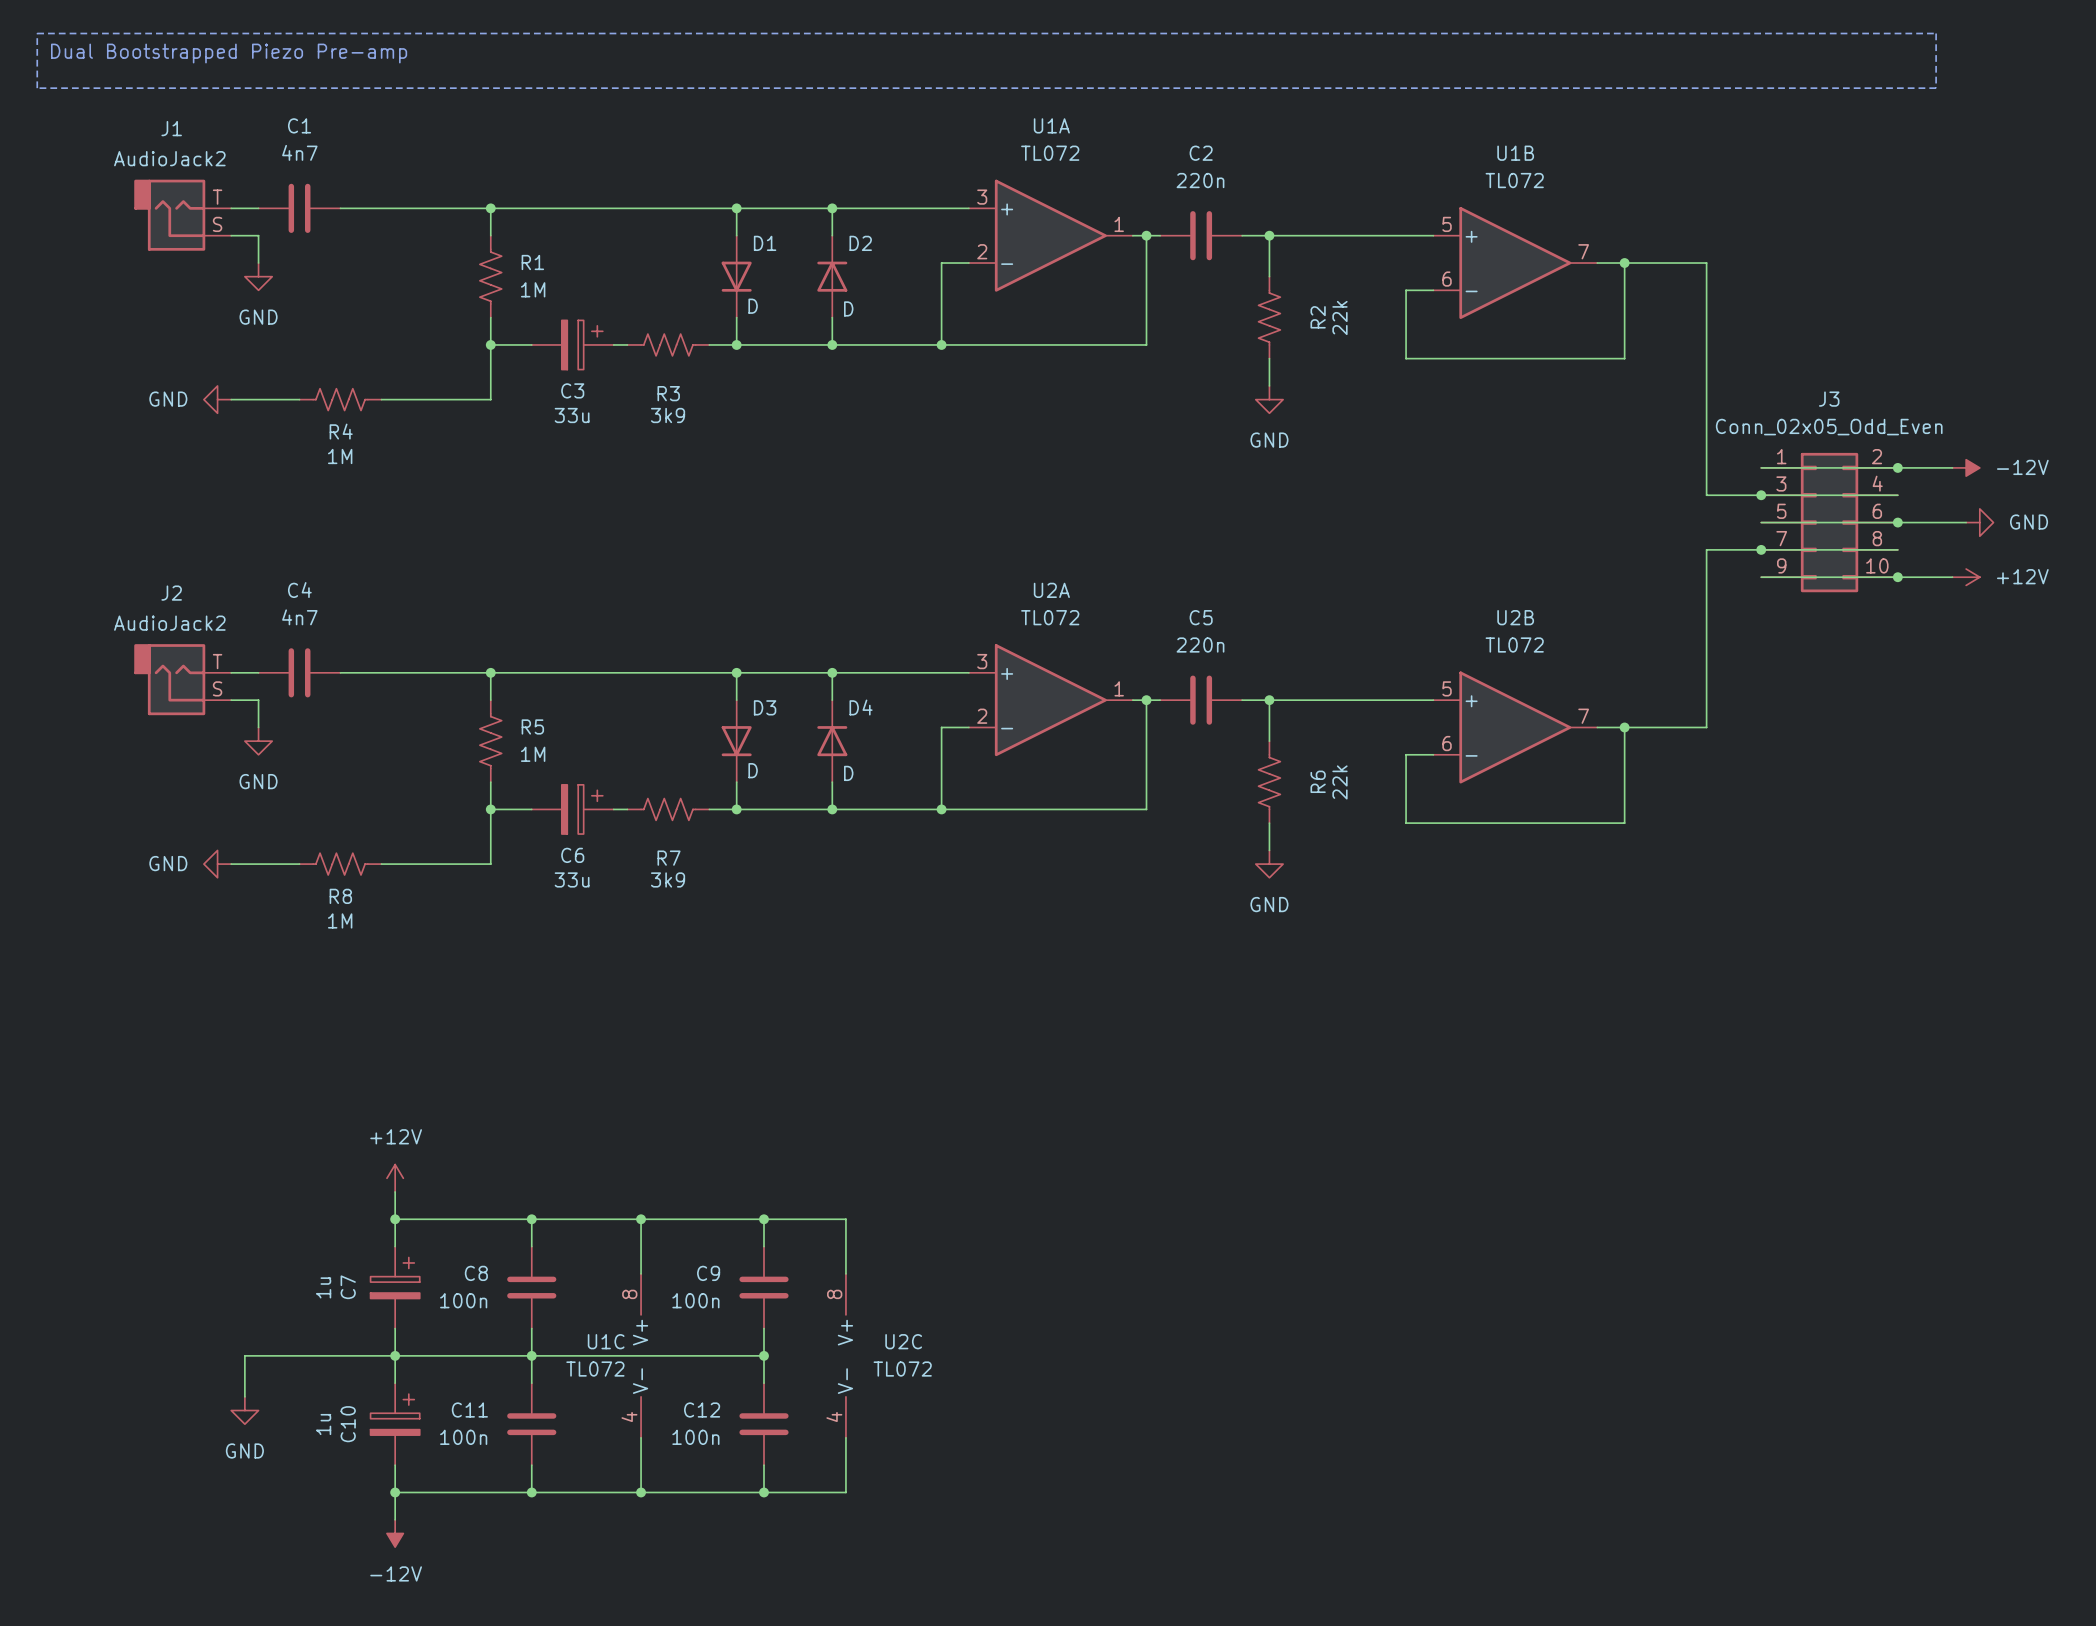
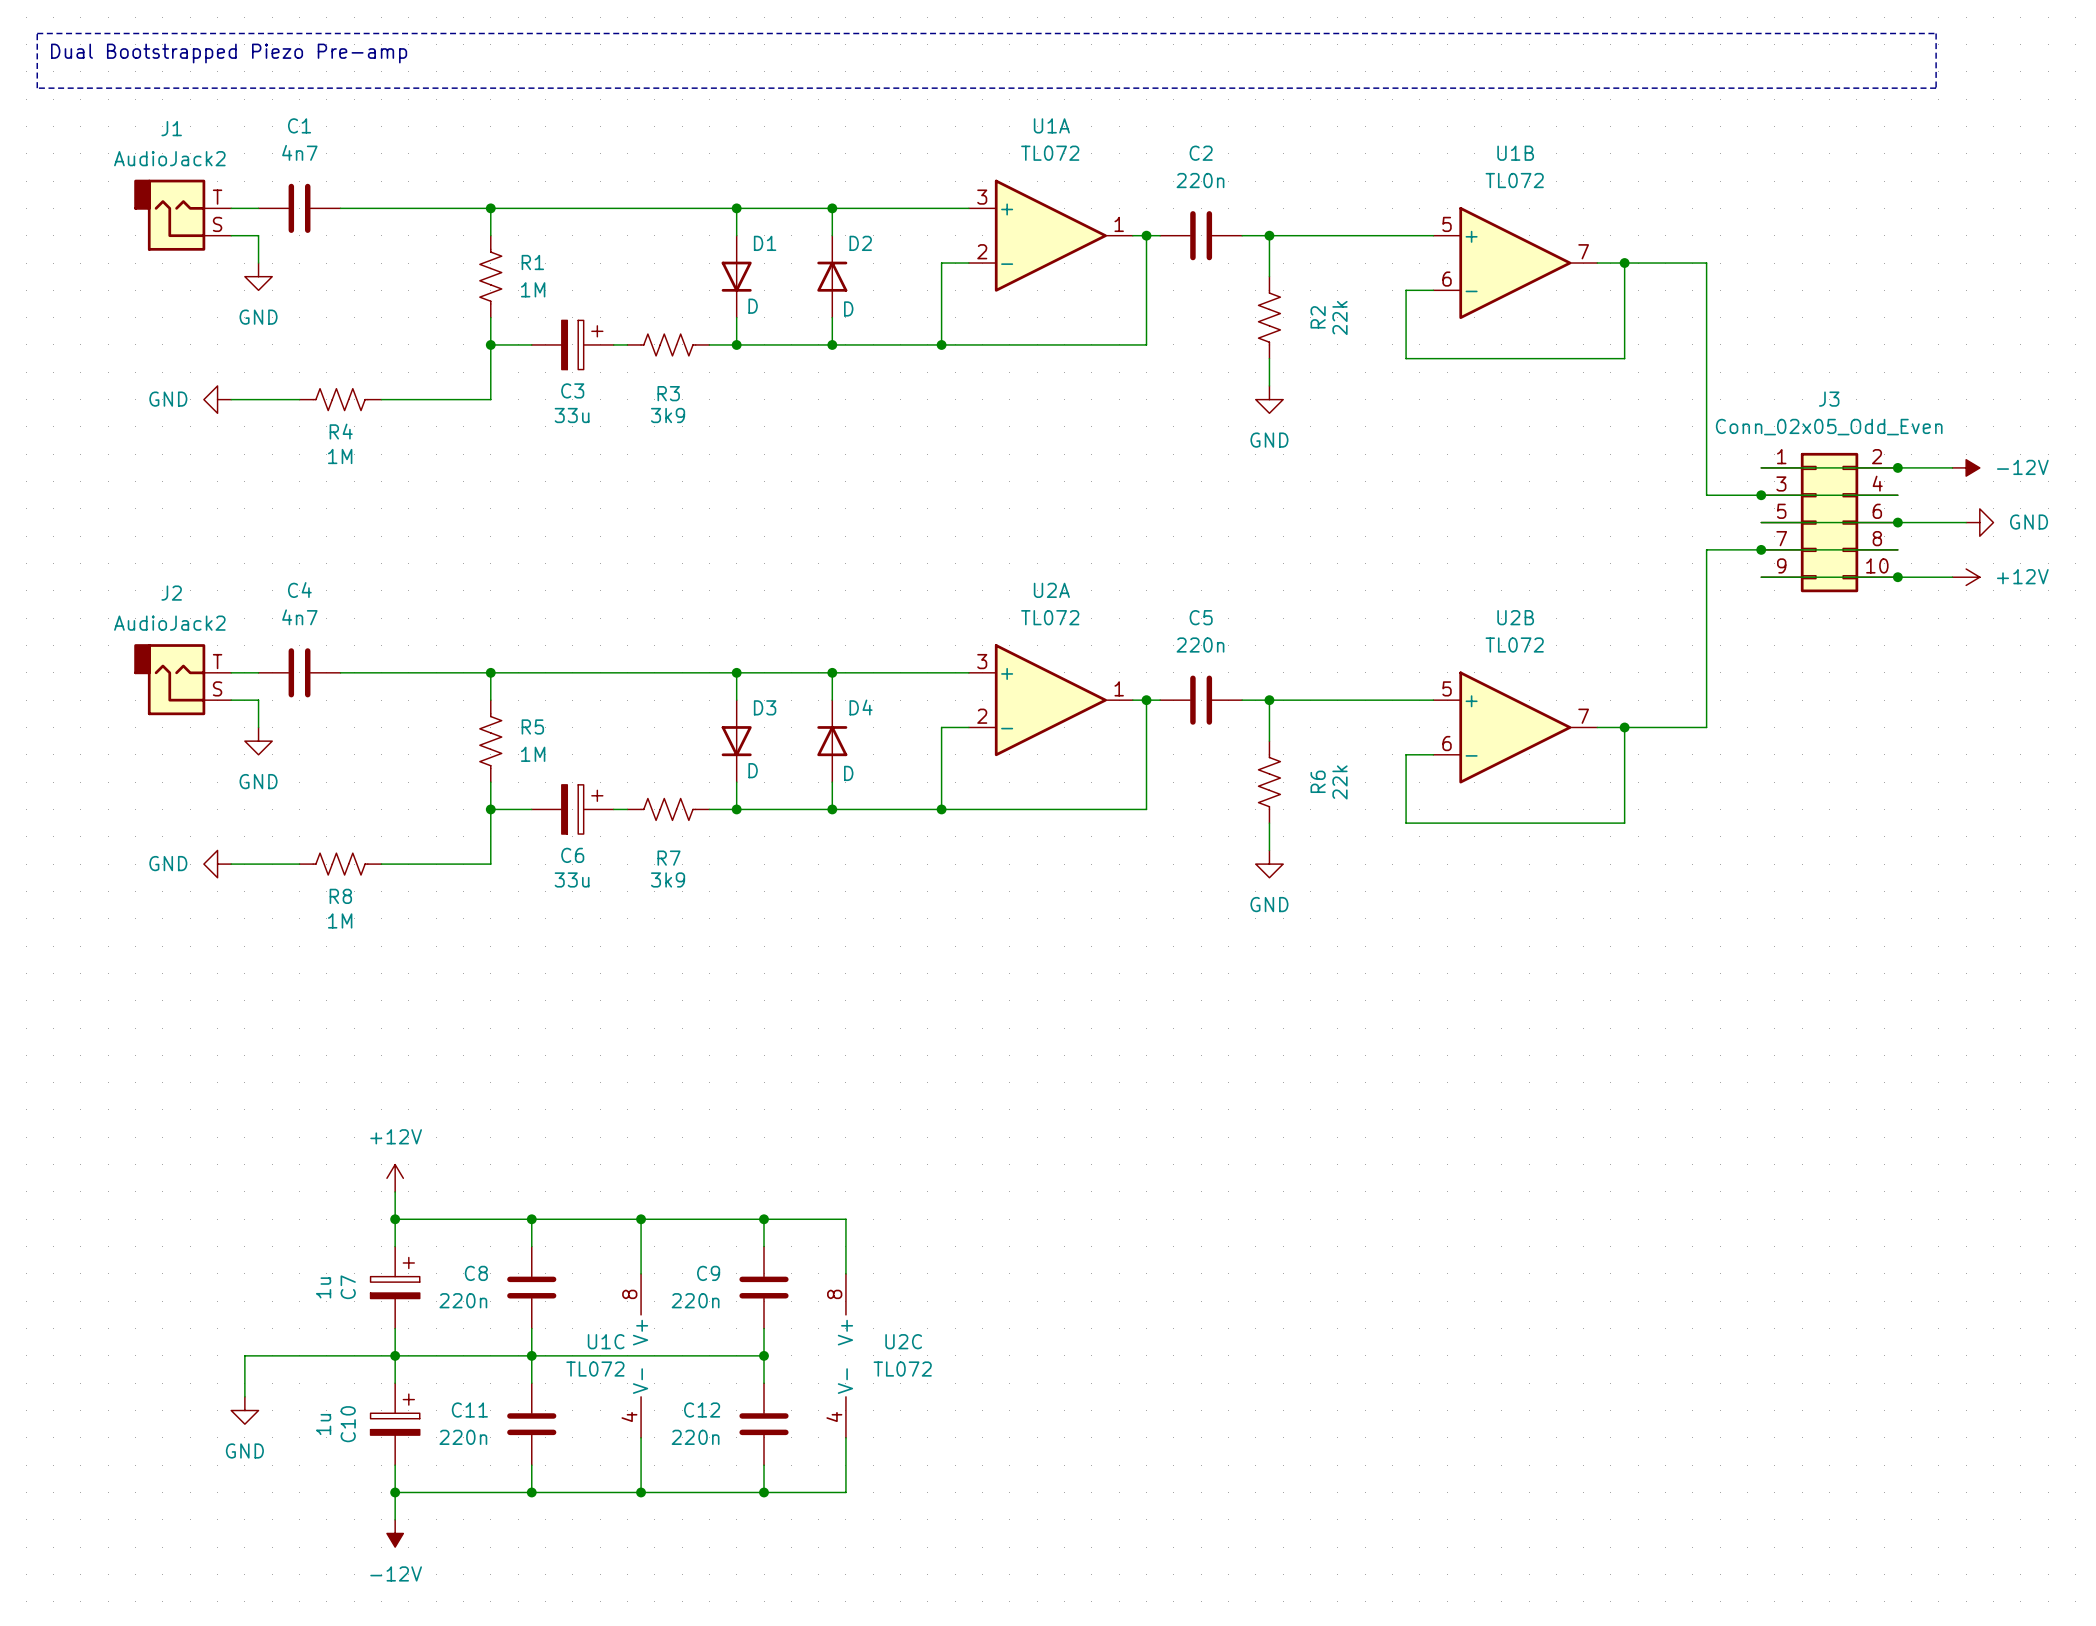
C8 value: 100n (463, 1300) -> 220n (463, 1300)
C9 value: 100n (695, 1300) -> 220n (695, 1300)
C11 value: 100n (463, 1437) -> 220n (463, 1437)
C12 value: 100n (695, 1437) -> 220n (695, 1437)

